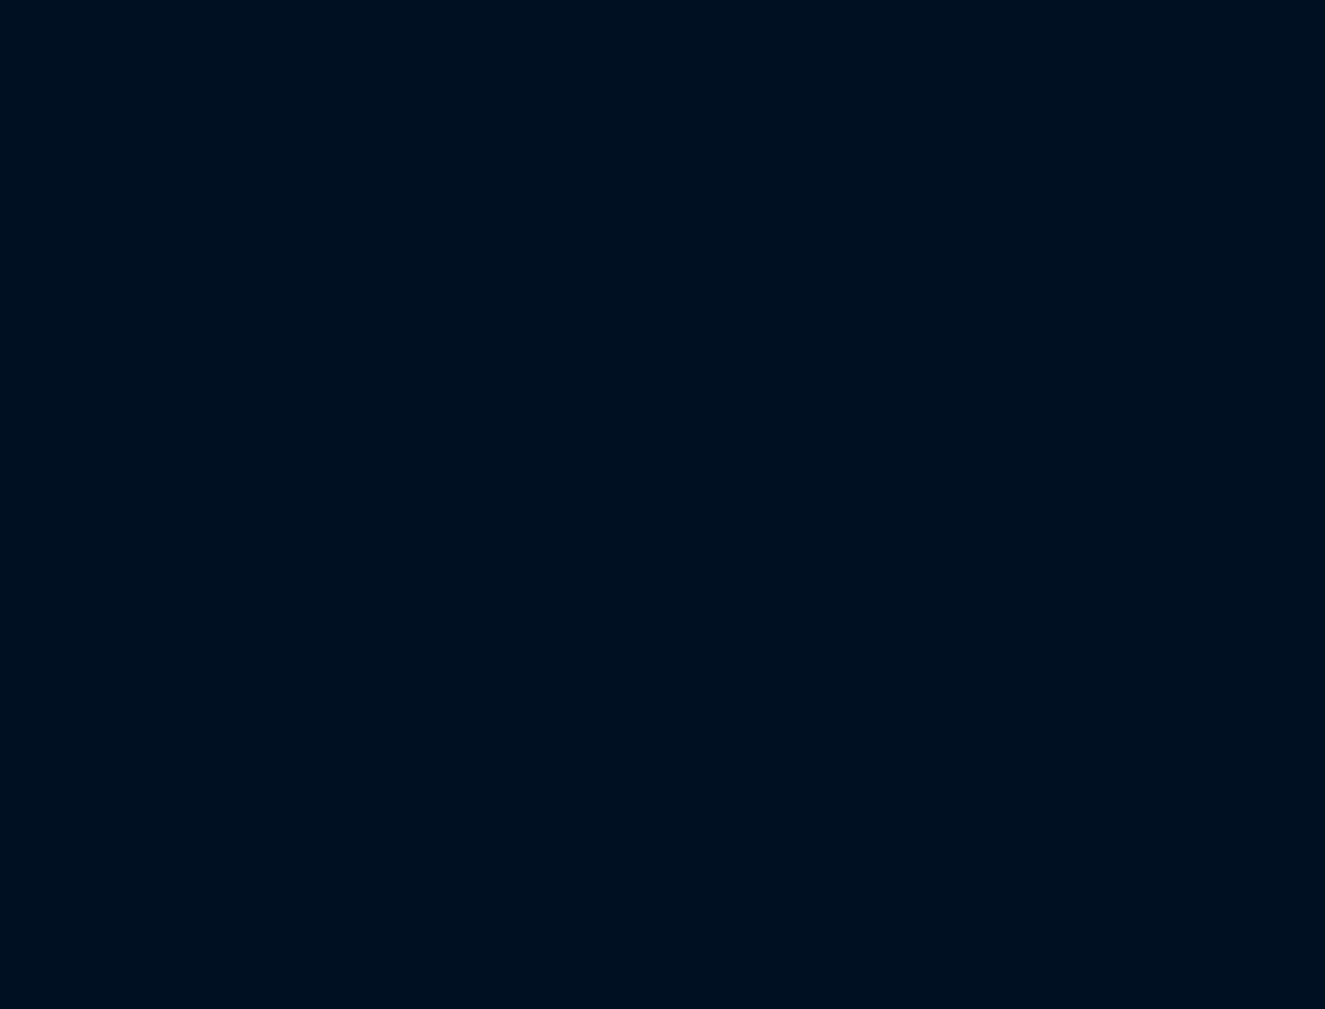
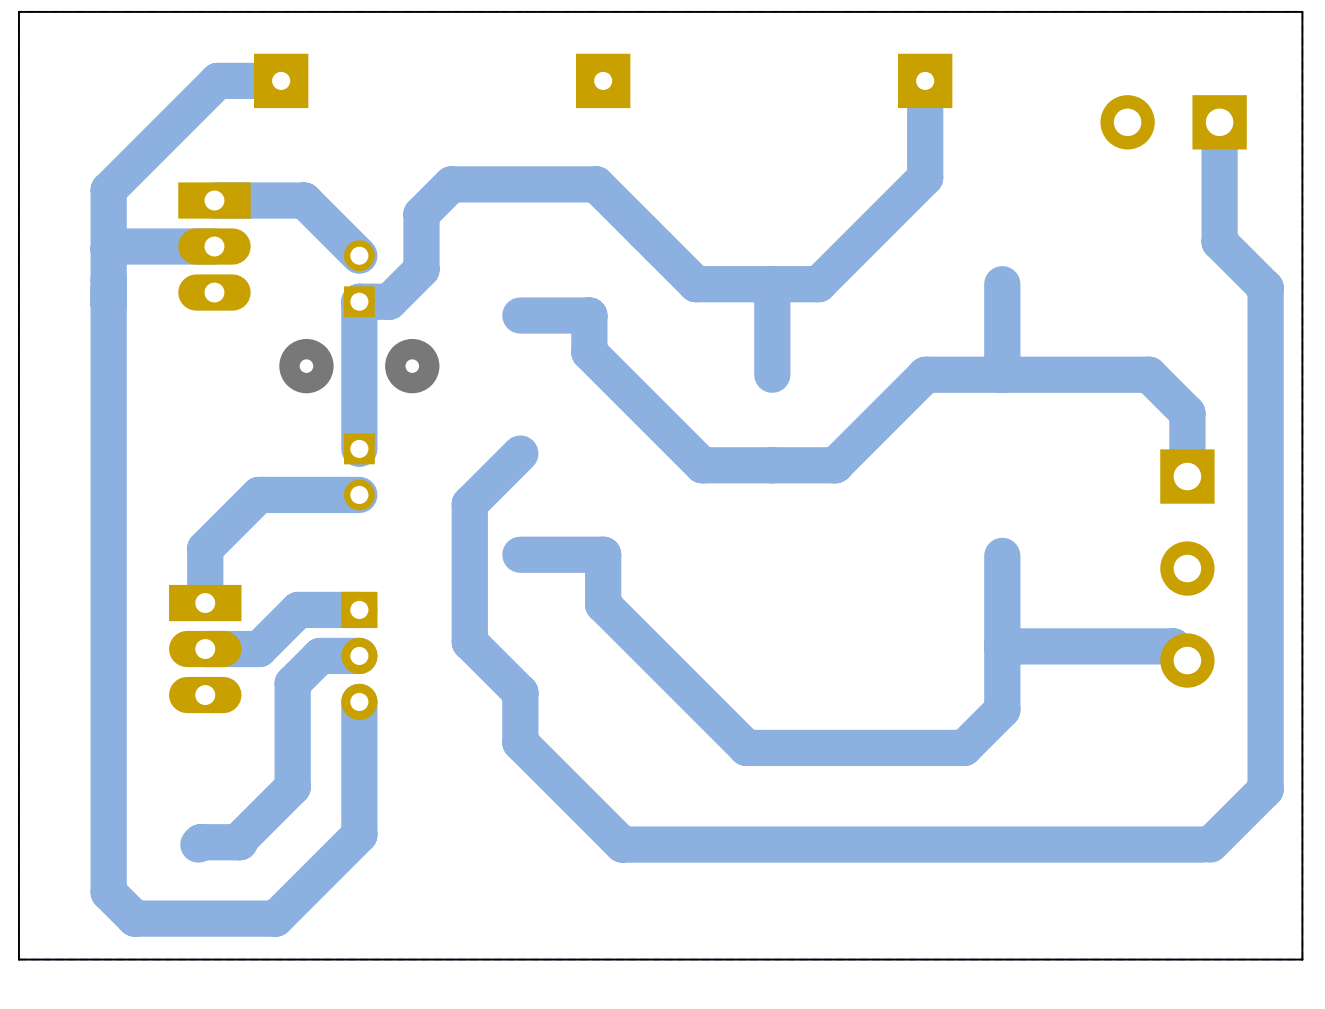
board edge: none -> (1302, 11) (1302, 959) (18, 959) (18, 11) (1302, 11)
track: none -> (281, 80) (217, 80) (108, 190) (108, 892) (134, 918) (275, 918) (359, 834) (359, 701)
part: none -> (281, 80)
part: none -> (603, 80)
track: none -> (925, 80) (925, 177) (818, 284) (696, 284) (596, 184) (451, 184) (421, 214) (421, 269) (389, 301) (359, 301) (359, 448)
part: none -> (925, 80)
part: none -> (1173, 122)
track: none -> (1219, 122) (1219, 241) (1265, 287) (1265, 789) (1210, 844)
track: none -> (214, 200) (304, 200) (359, 255)
track: none -> (214, 246) (110, 246) (108, 248)
part: none -> (214, 246)
part: none -> (359, 278)
track: none -> (772, 284) (772, 374)
track: none -> (1002, 284) (1002, 374)
track: none -> (520, 315) (589, 315) (589, 352) (702, 465) (835, 465) (925, 374) (1149, 374) (1187, 413) (1187, 476)
via: none -> (306, 366)
via: none -> (412, 366)
track: none -> (520, 453) (469, 504) (469, 642) (520, 692) (520, 742) (622, 844) (1202, 844)
part: none -> (359, 471)
track: none -> (359, 494) (259, 494) (205, 548) (205, 603)
track: none -> (520, 554) (603, 554) (603, 604) (746, 747) (964, 747) (1002, 709) (1002, 555)
part: none -> (1187, 568)
track: none -> (359, 609) (298, 609) (259, 649) (205, 649)
track: none -> (1002, 646) (1173, 646) (1187, 660)
part: none -> (205, 649)
track: none -> (359, 655) (320, 655) (292, 683) (292, 787) (239, 839) (239, 842) (200, 842) (198, 844)
part: none -> (359, 655)

